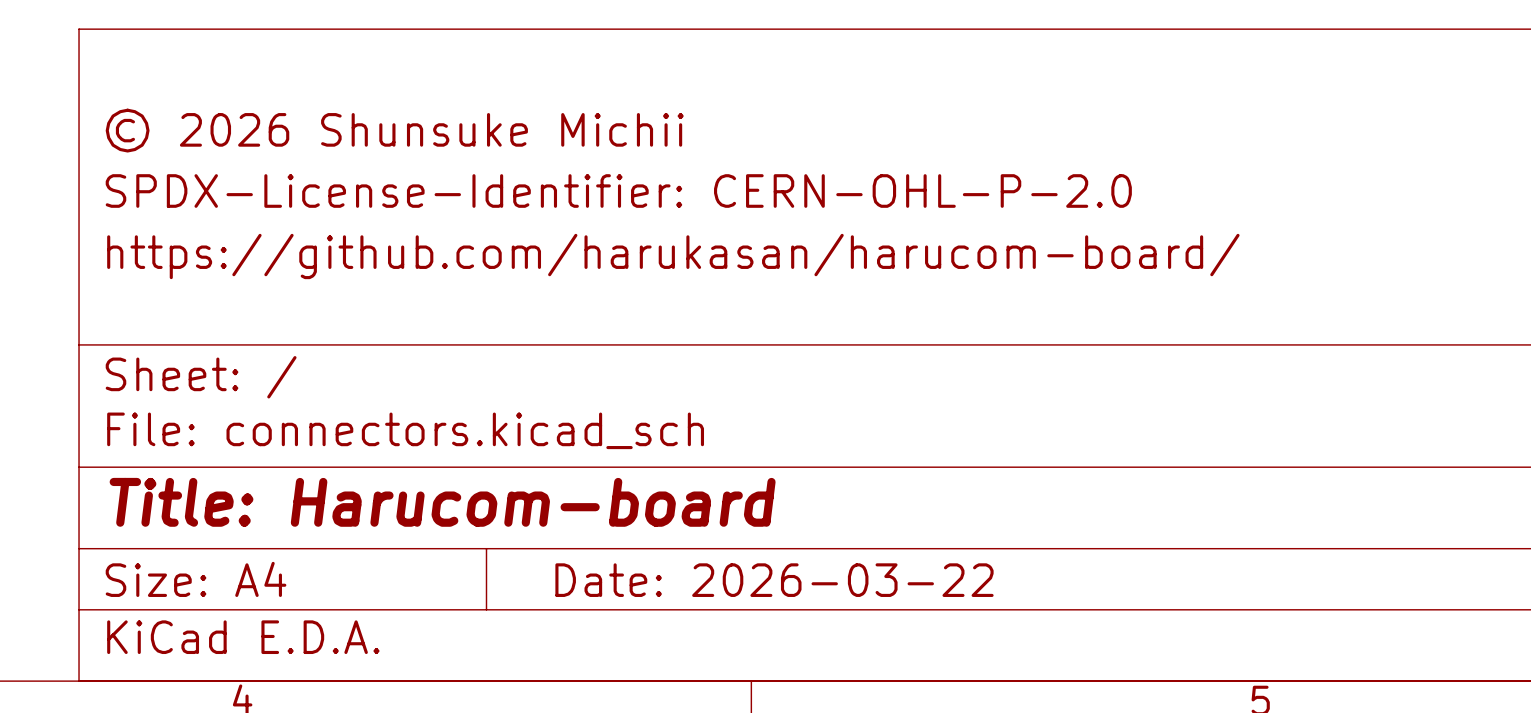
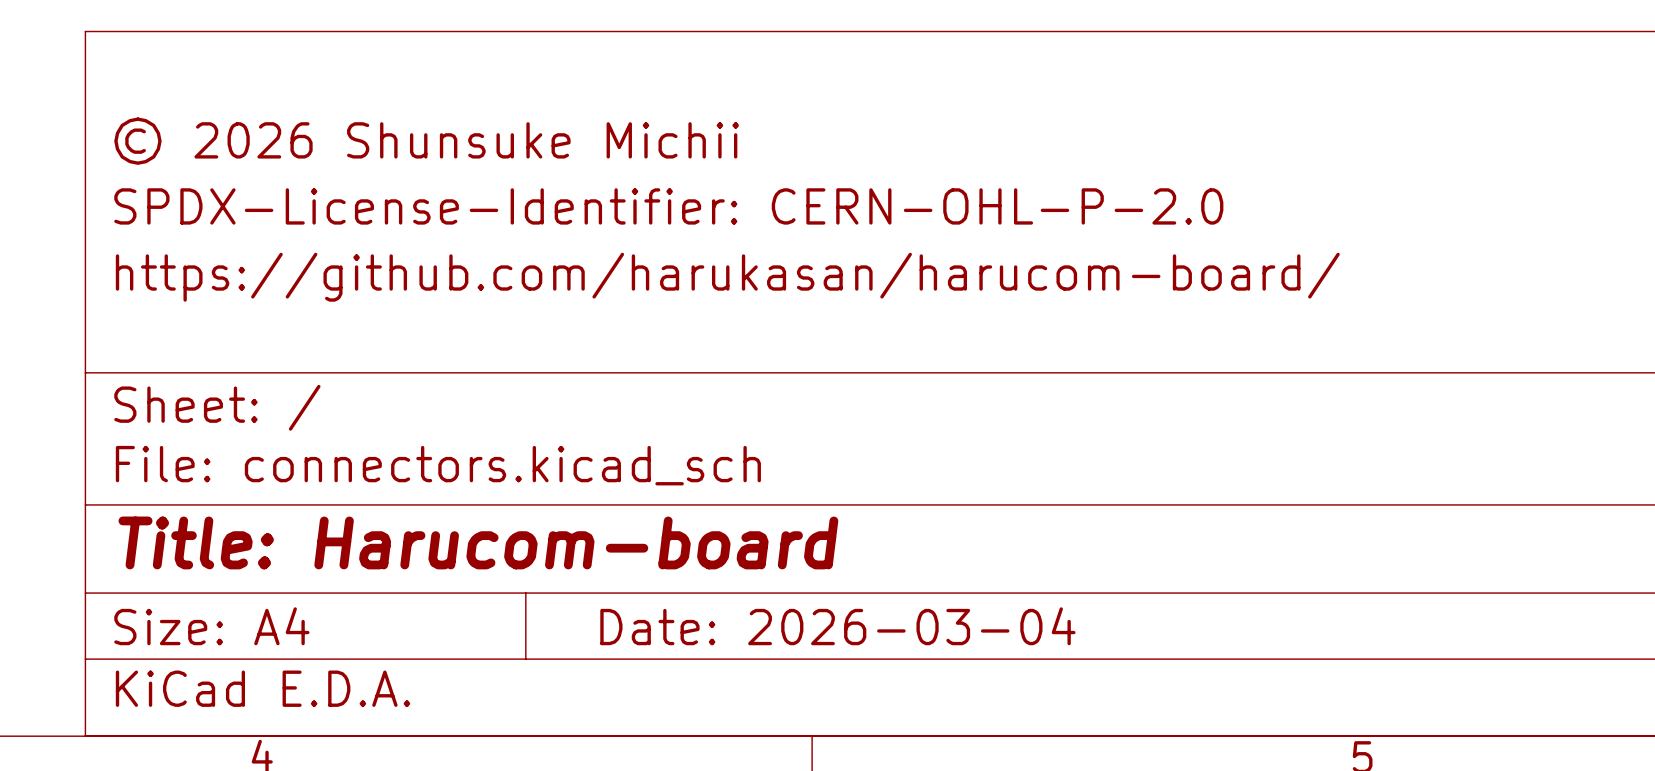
title block: Date: 2026-03-22 (774, 580) -> Date: 2026-03-04 (837, 626)

